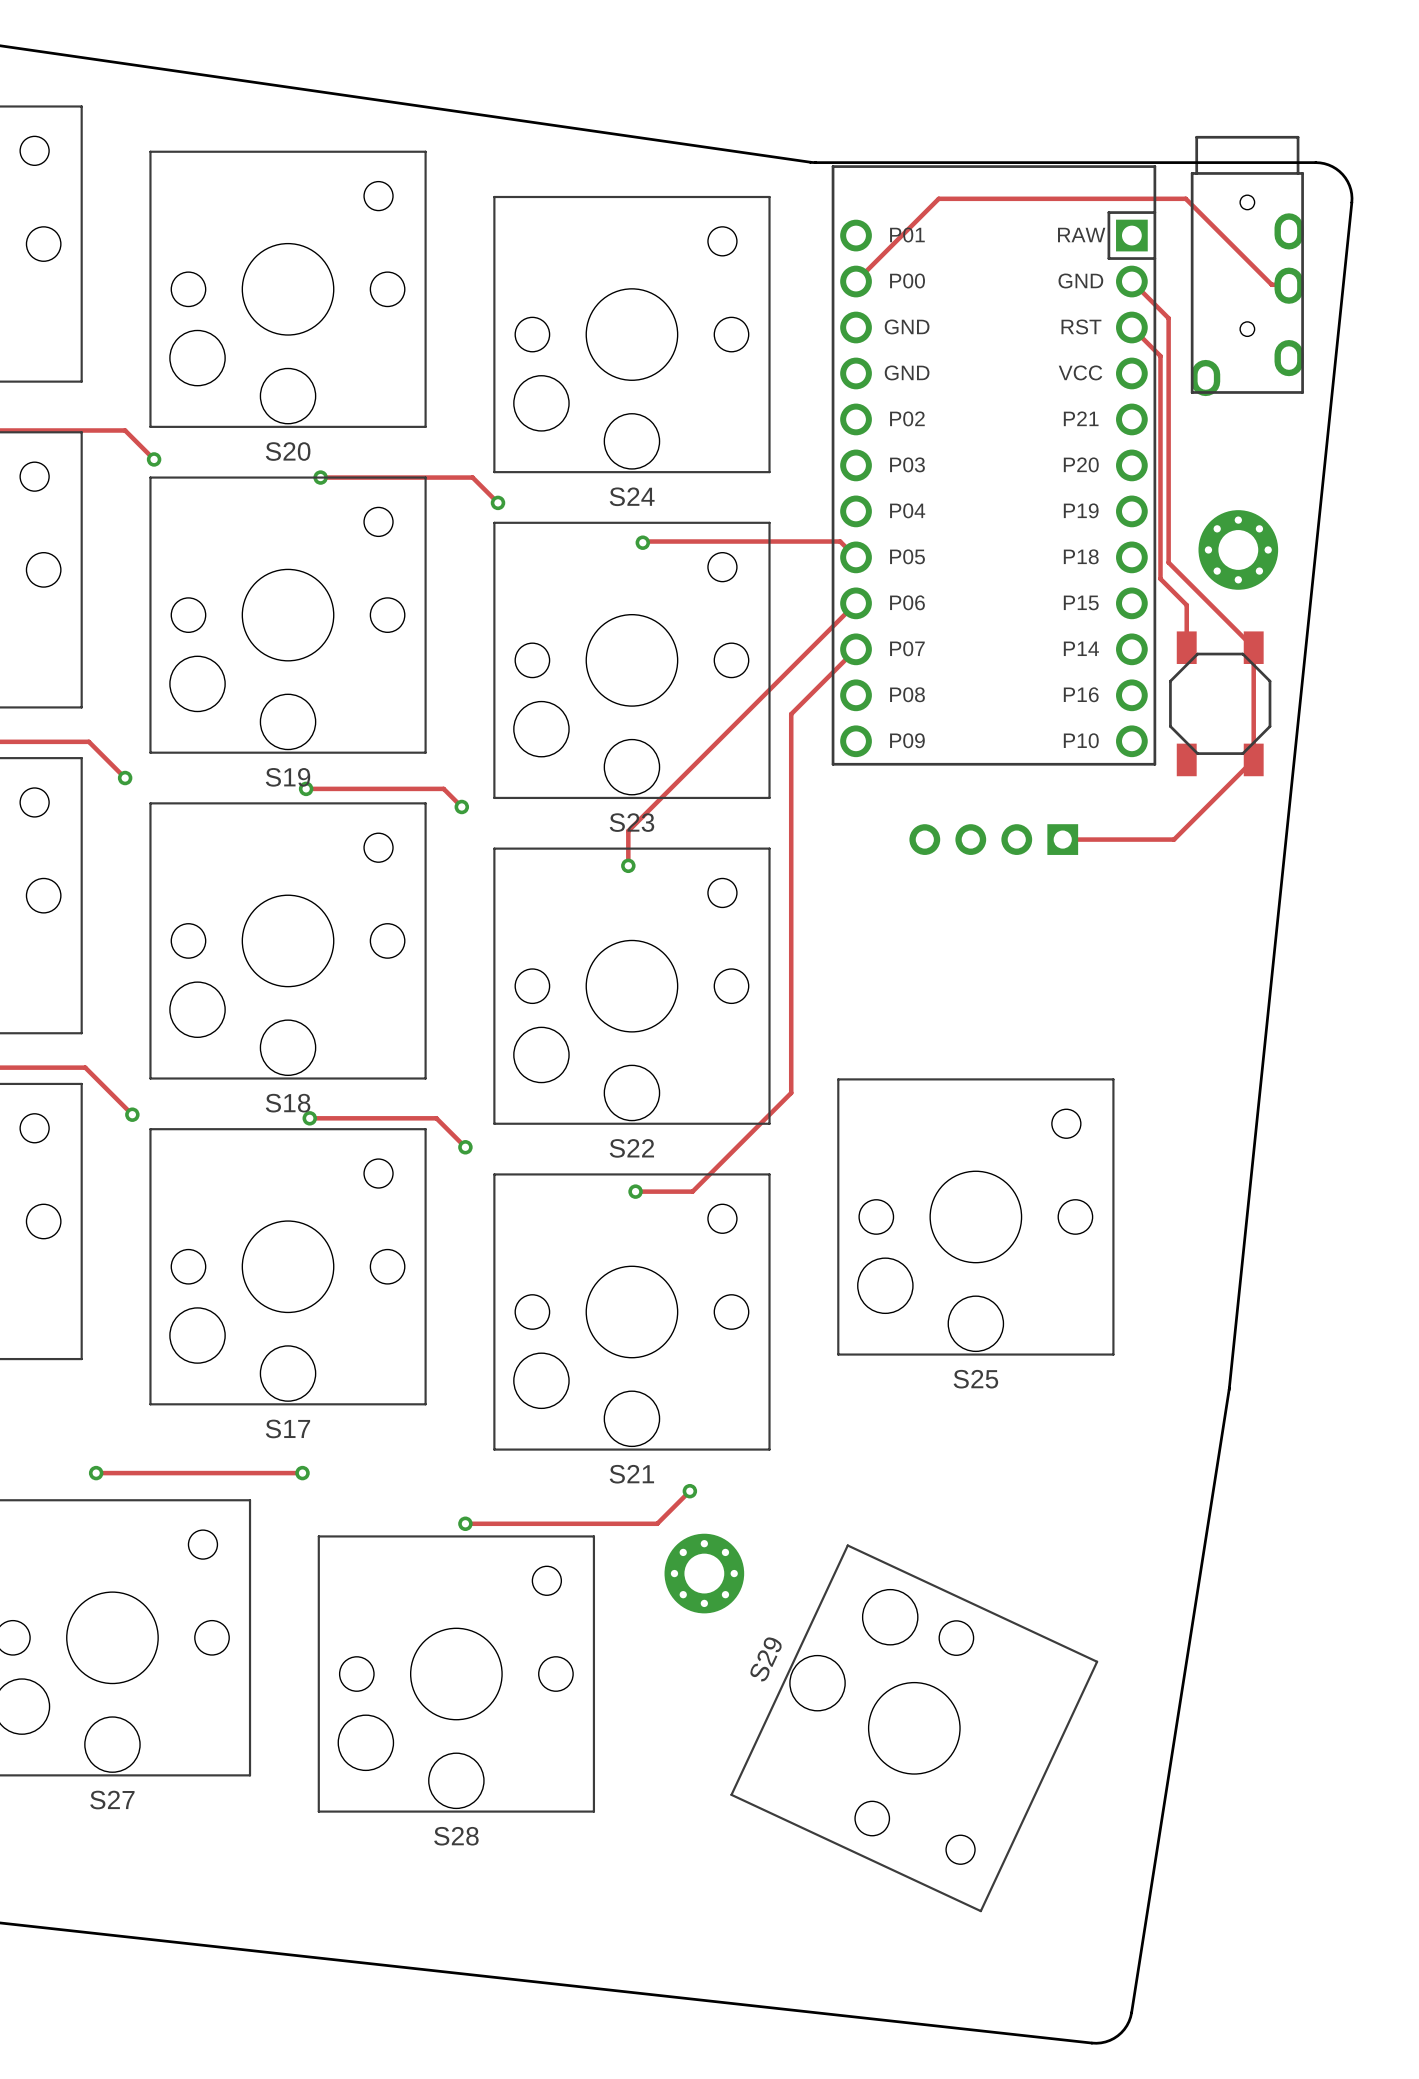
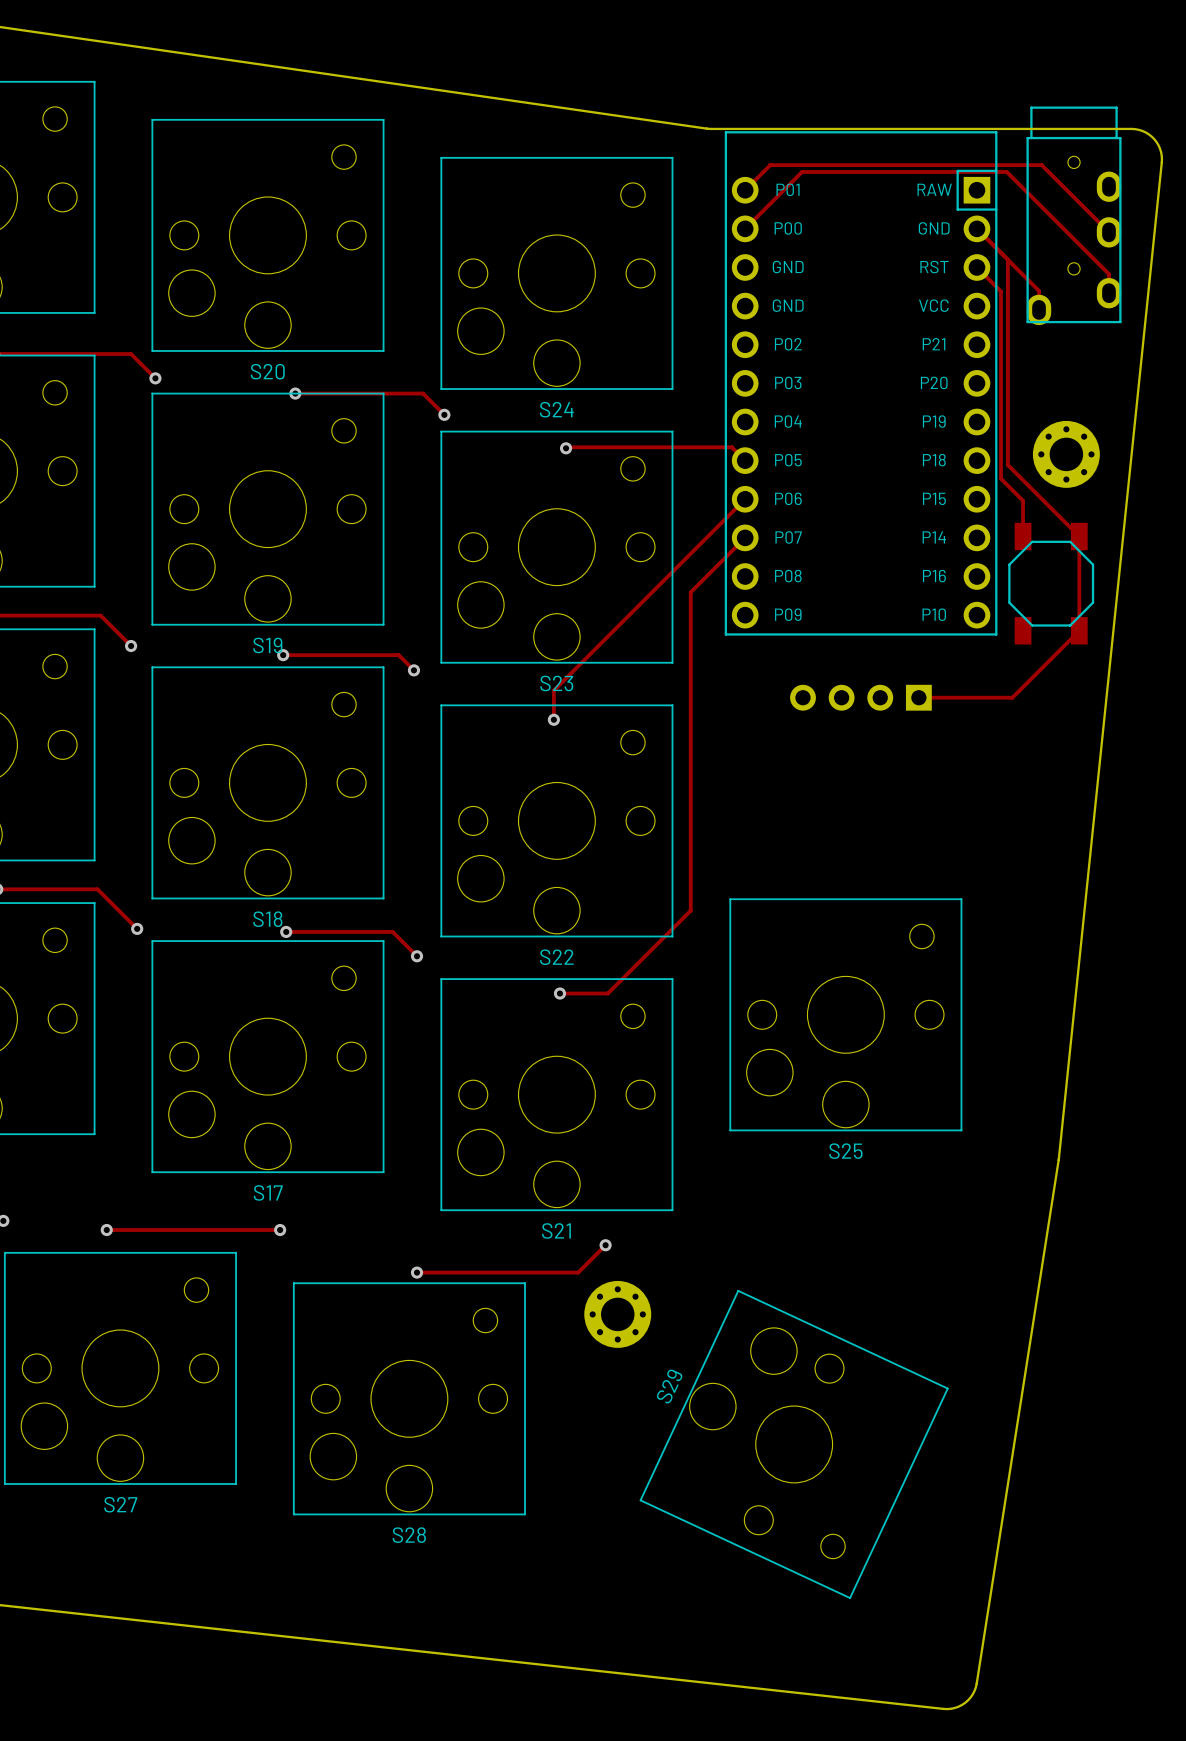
track: (923, 213) (938, 198) (1185, 198) (1271, 284) (1283, 284) -> (802, 171) (1006, 171) (1108, 274) (1108, 293)
track: none -> (745, 190) (770, 165) (1041, 165) (1108, 232)
track: none -> (1007, 259) (1039, 290) (1039, 309)

